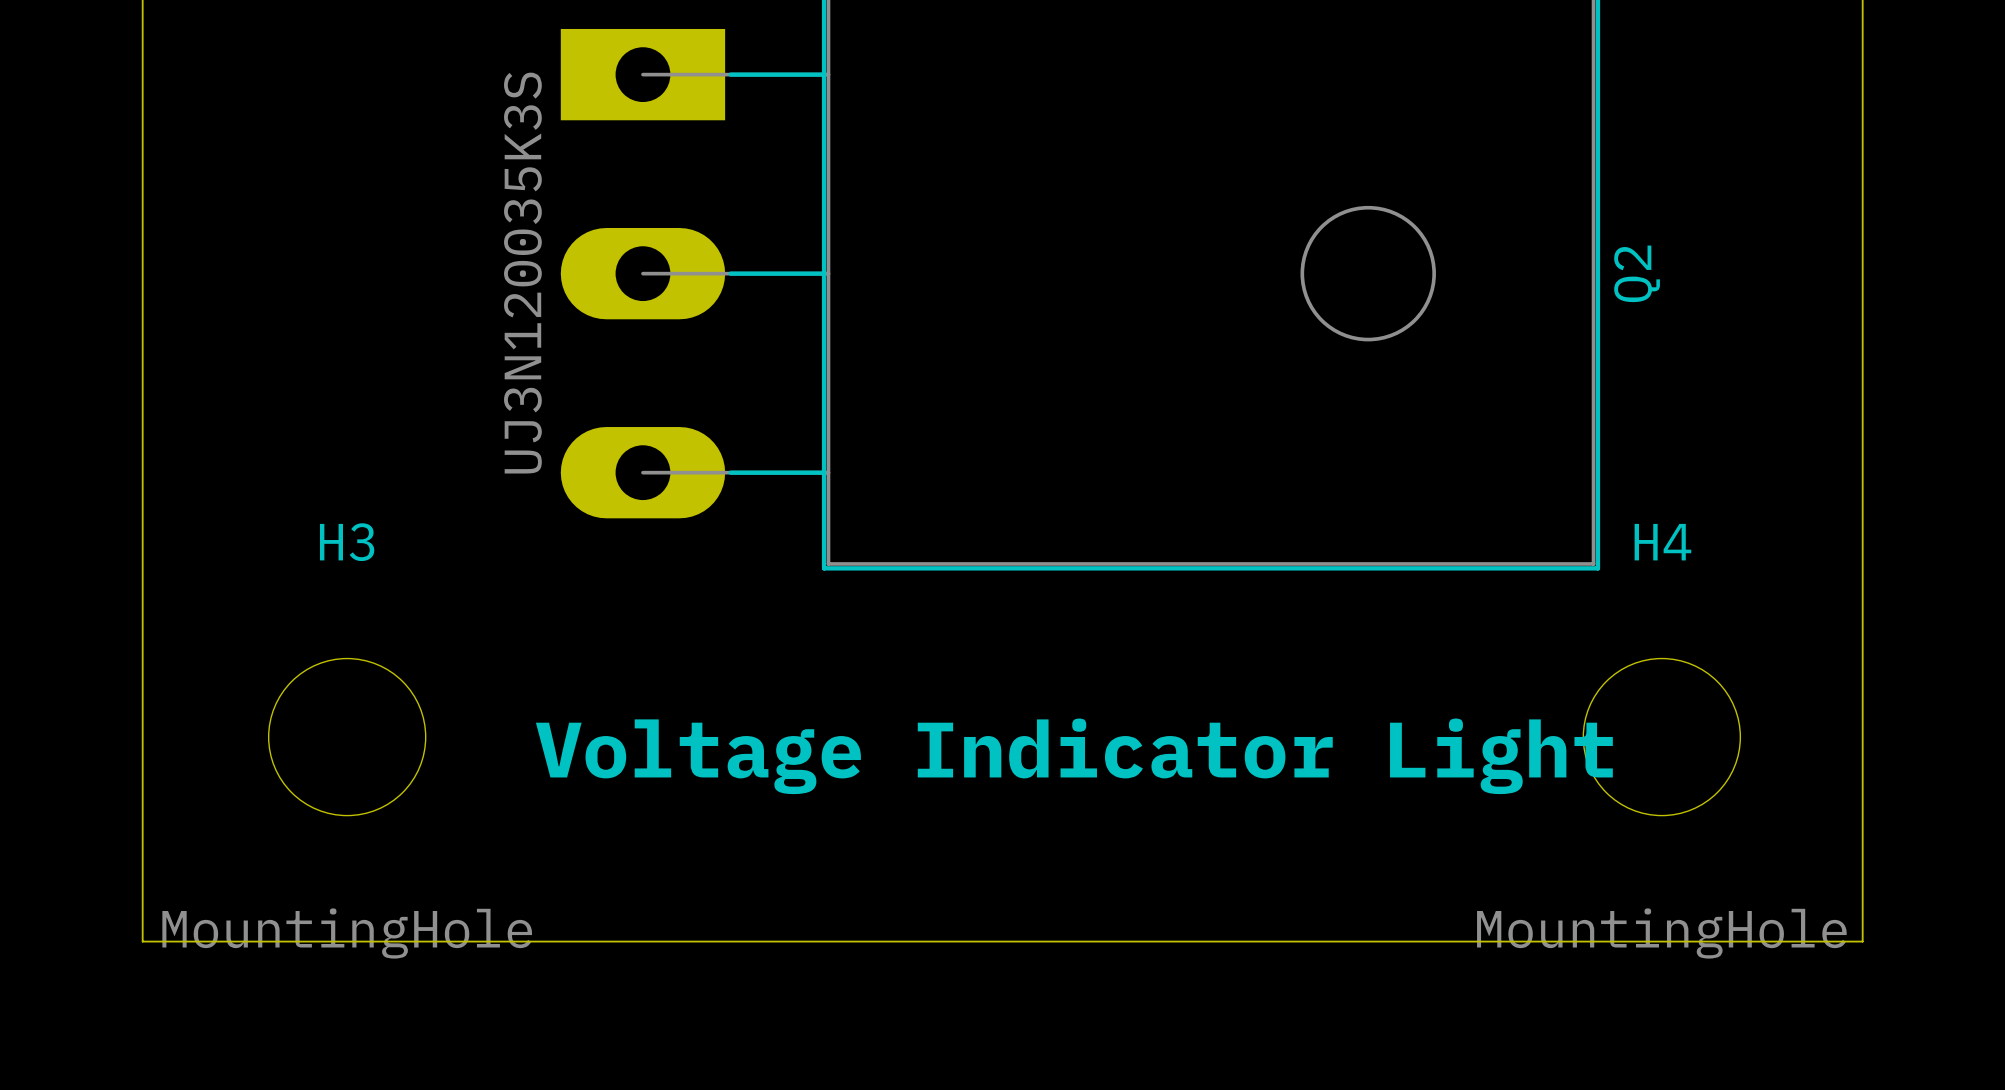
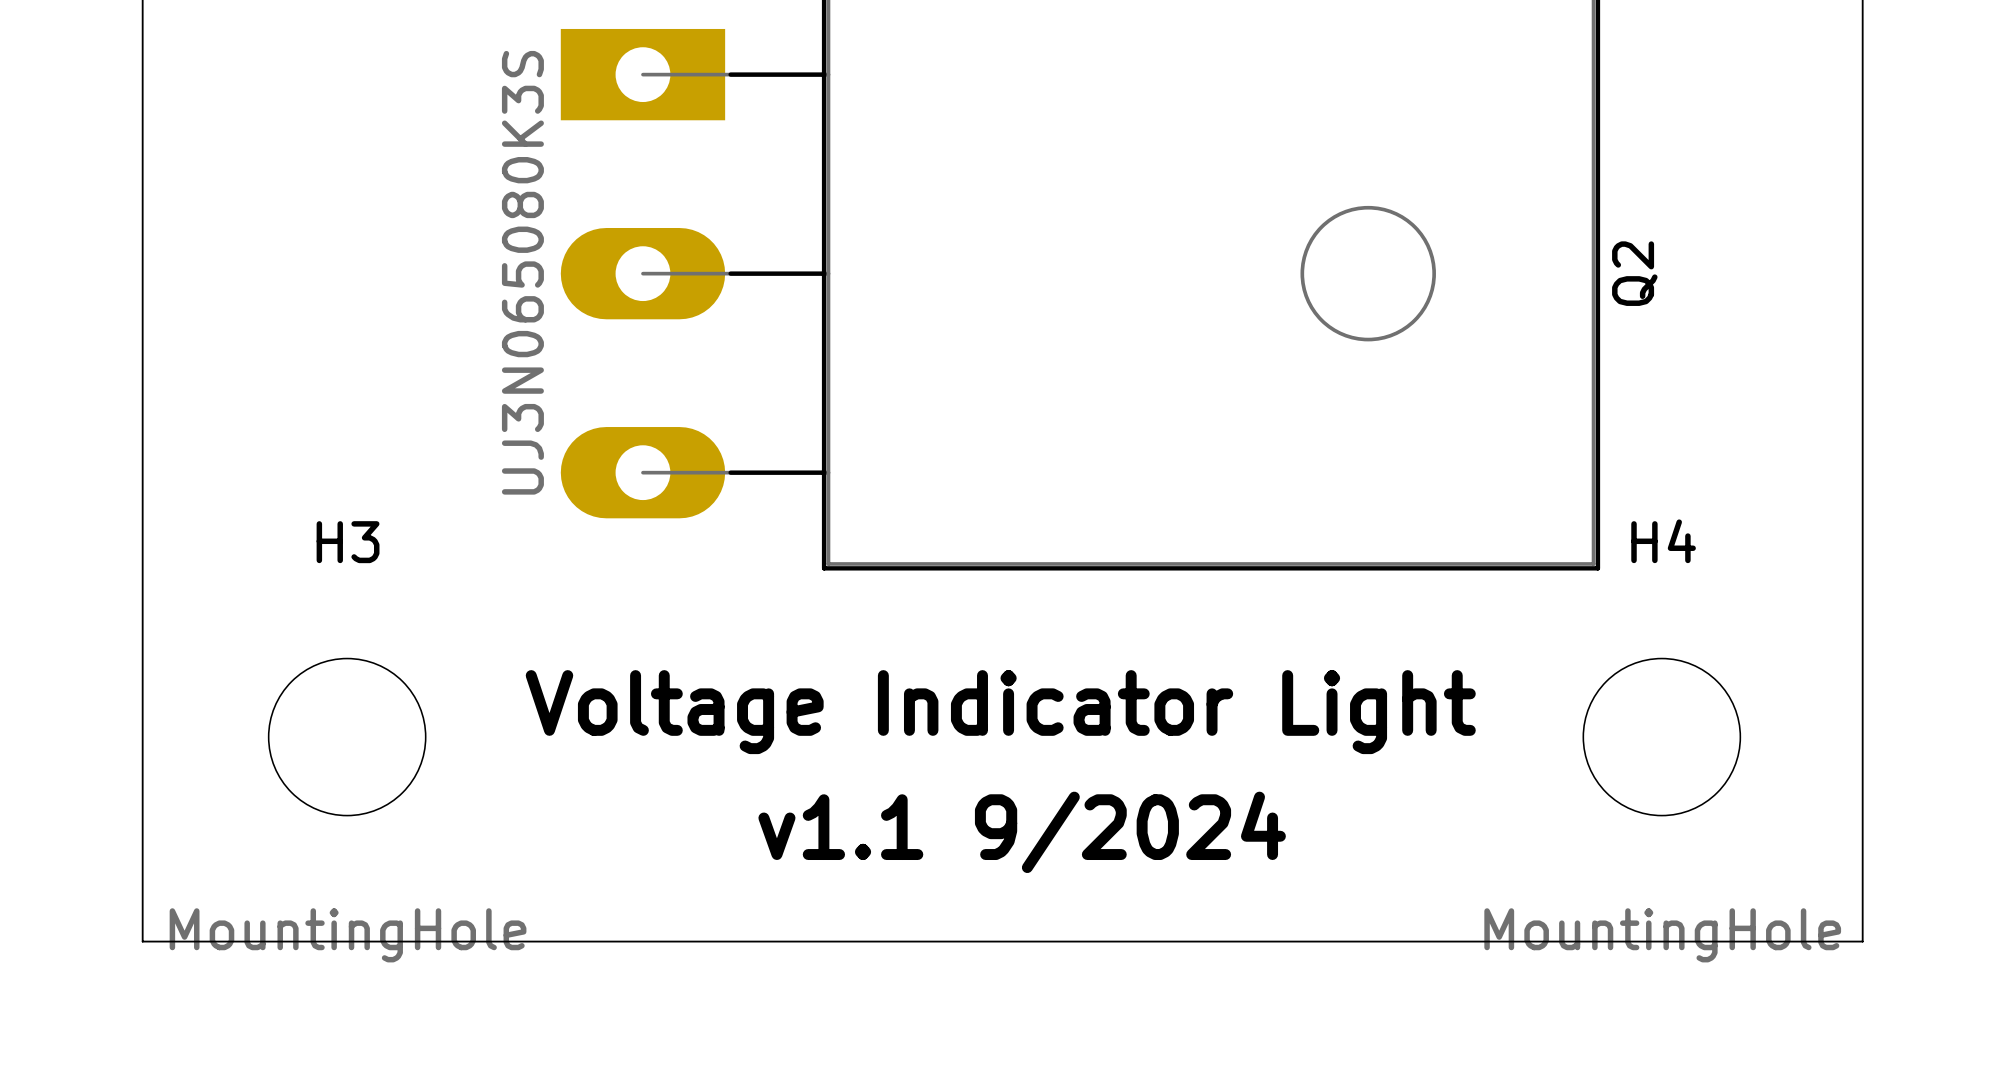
Q2 value: UJ3N120035K3S (522, 273) -> UJ3N065080K3S (522, 272)
text position: Voltage Indicator Light (1074, 756) -> Voltage Indicator Light (1000, 712)
text: none -> v1.1 9/2024 (1022, 832)

